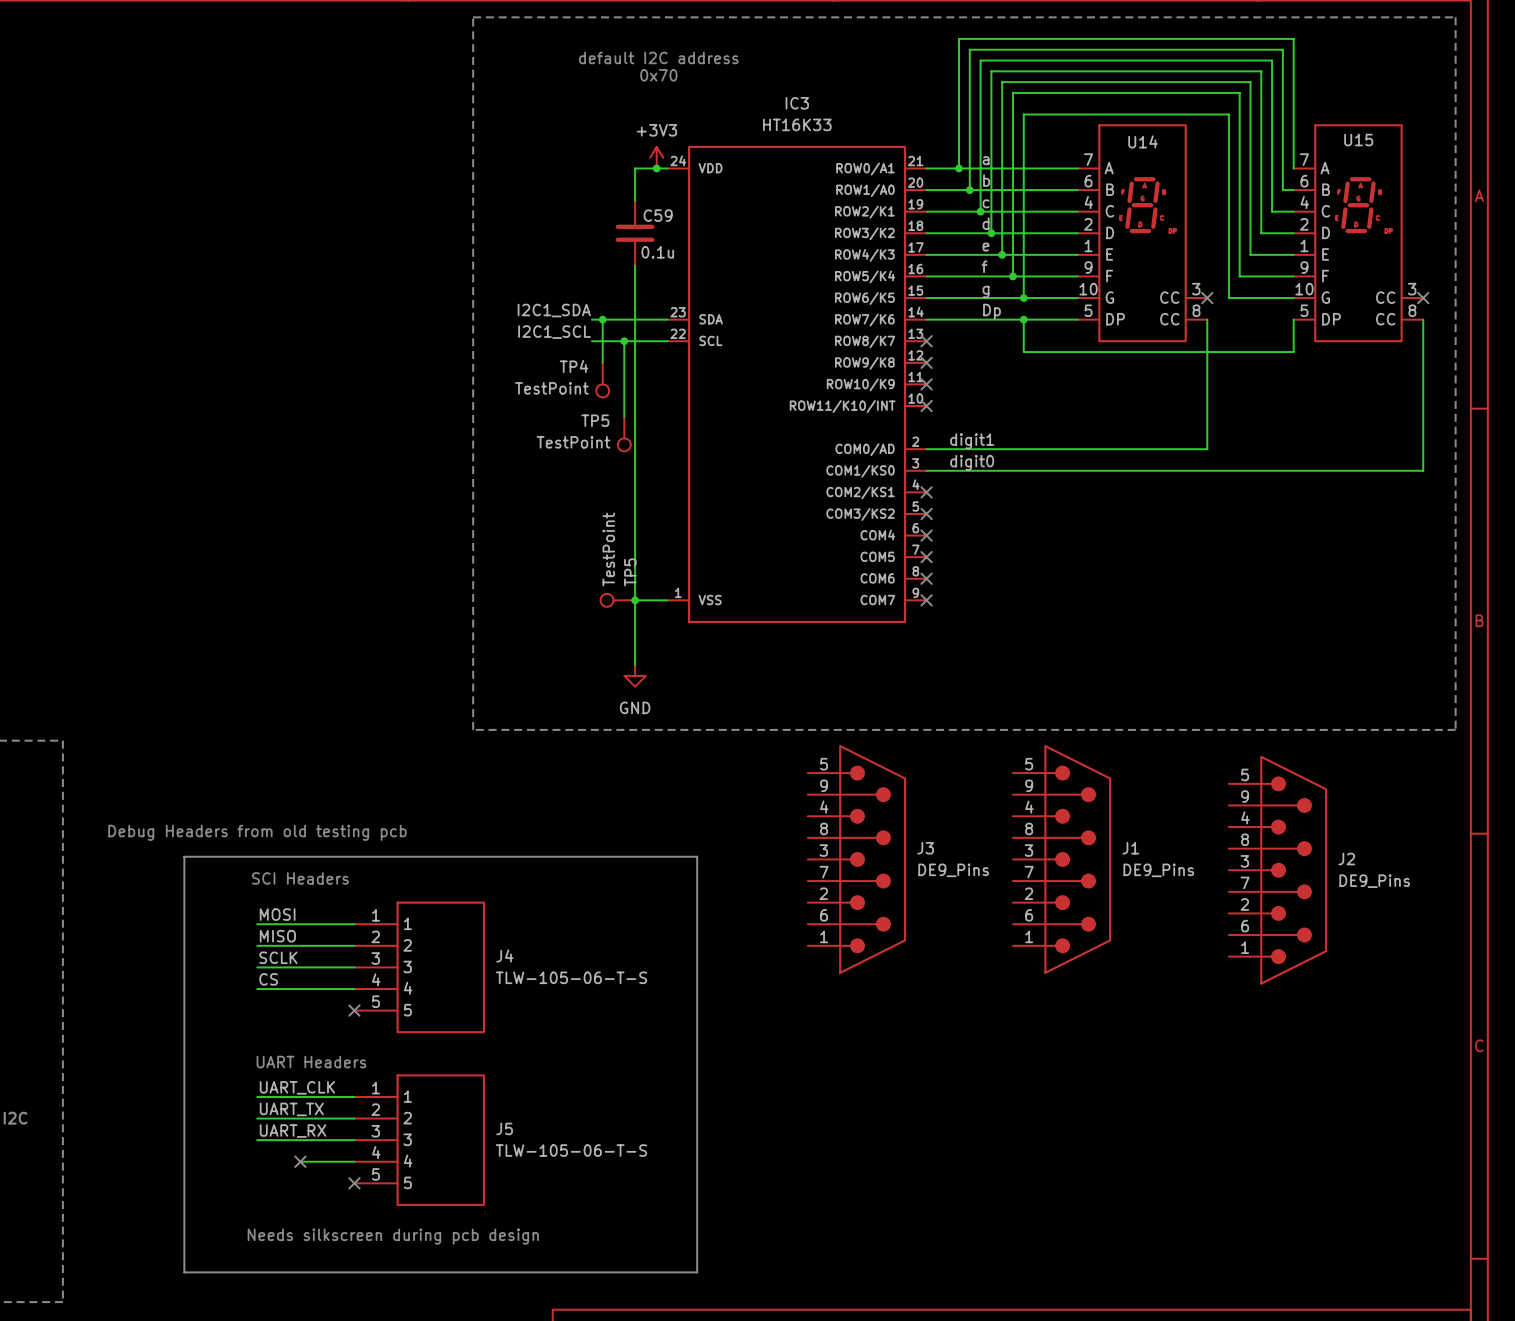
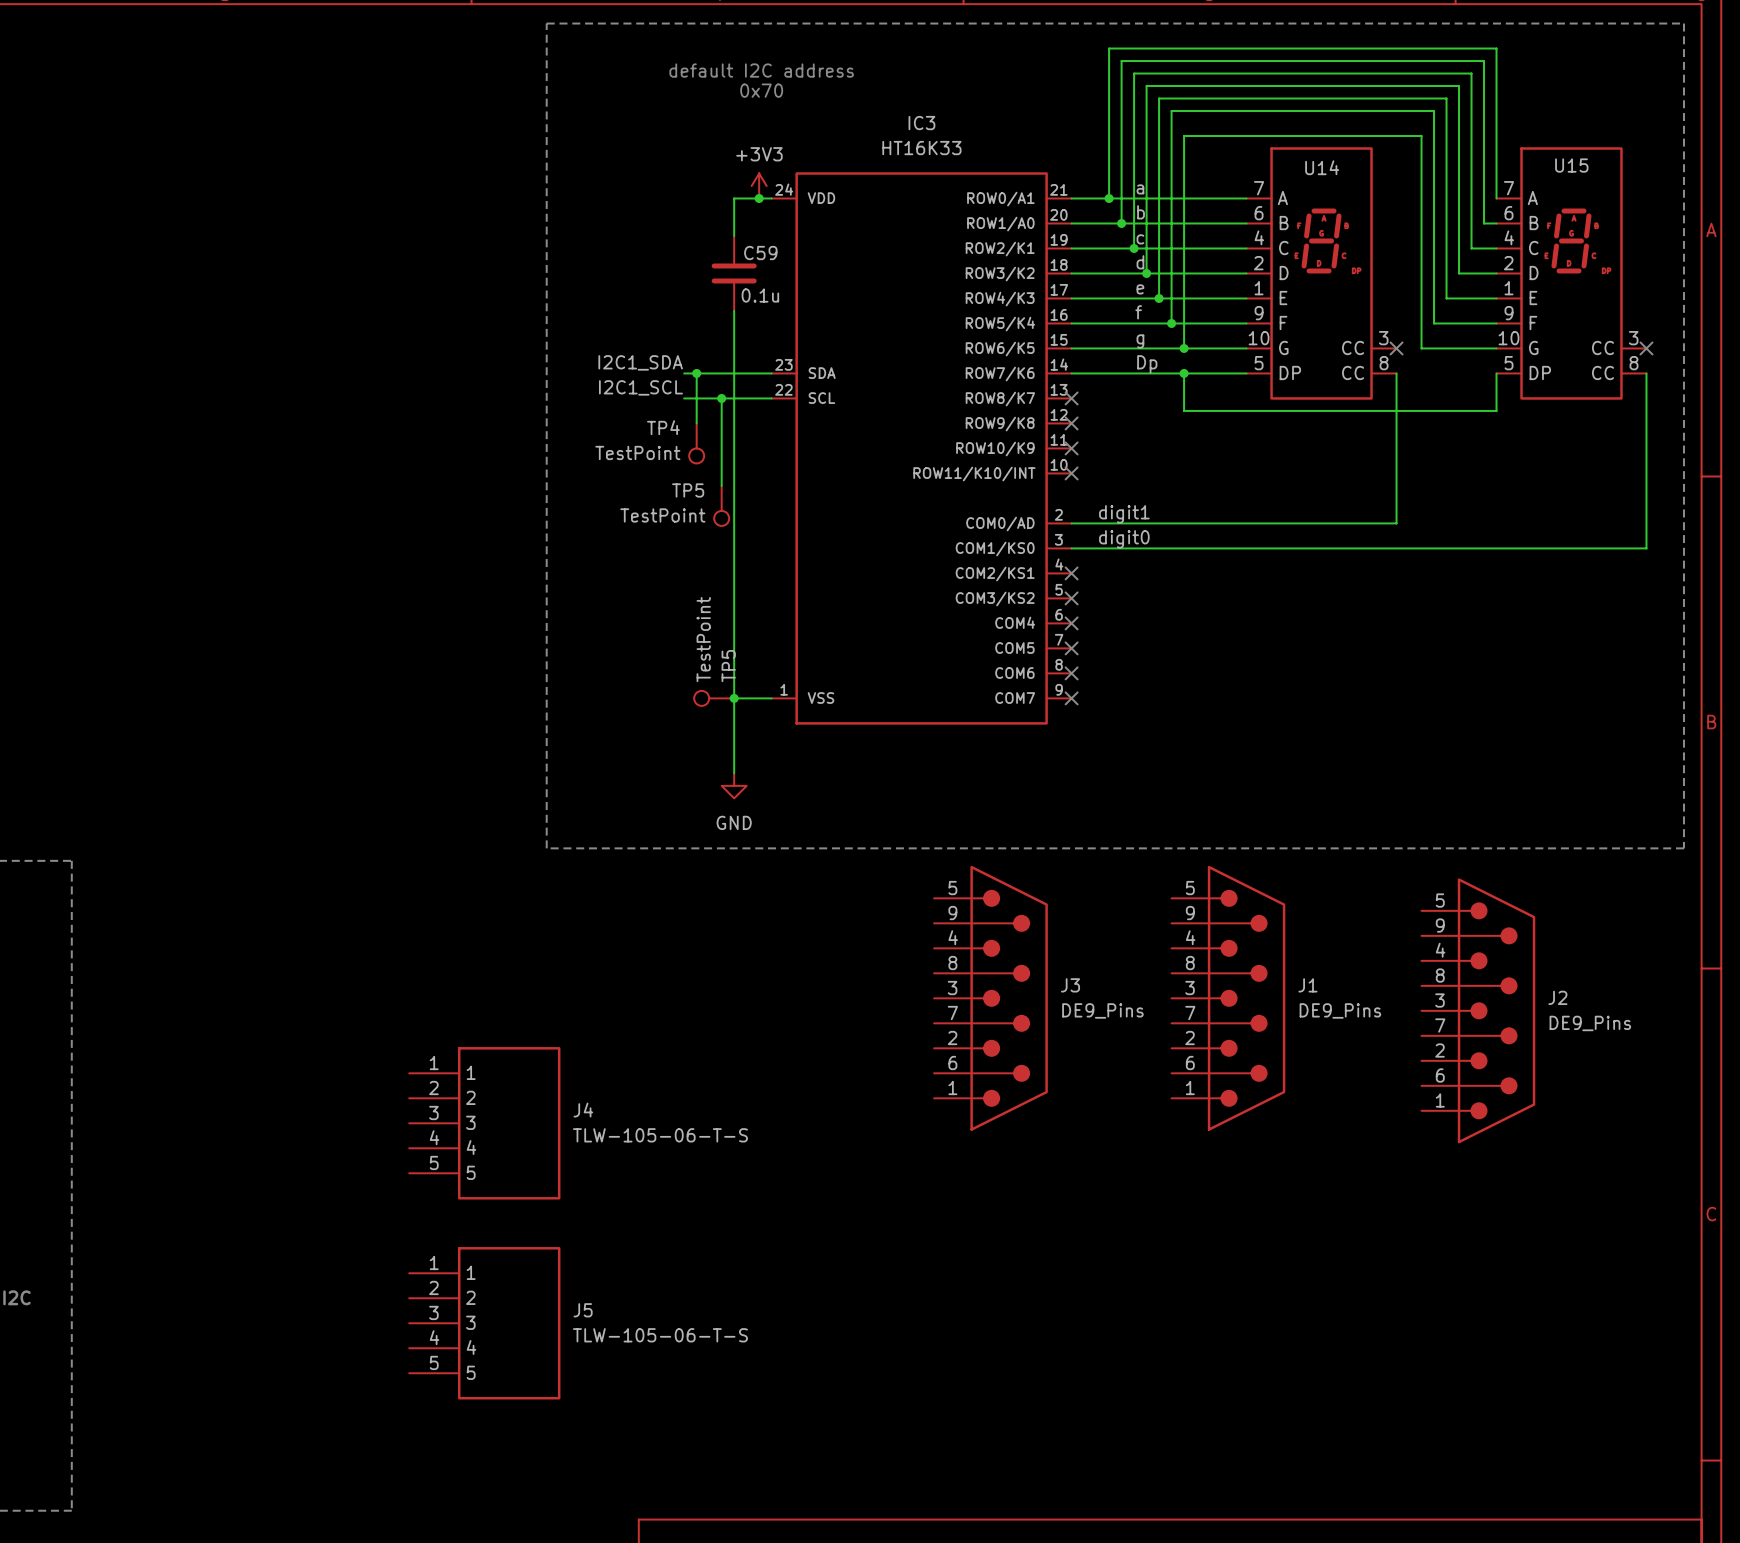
text: Debug Headers from old testing pcb (257, 832) -> none
line: (184, 856) (697, 856) (697, 1272) (184, 1272) (184, 856) -> none
text: SCI Headers (300, 878) -> none
label: MOSI (277, 914) -> none
wire: (257, 924) (354, 924) -> none
label: MISO (277, 936) -> none
wire: (257, 945) (354, 945) -> none
label: SCLK (278, 957) -> none
wire: (257, 967) (354, 967) -> none
label: CS (268, 979) -> none
wire: (257, 989) (354, 989) -> none
no-connect mark: (354, 1010) -> none
text: UART Headers (311, 1062) -> none
label: UART_CLK (297, 1087) -> none
wire: (257, 1096) (354, 1096) -> none
label: UART_TX (291, 1109) -> none
wire: (257, 1118) (354, 1118) -> none
label: UART_RX (293, 1131) -> none
wire: (257, 1140) (354, 1140) -> none
wire: (300, 1161) (354, 1161) -> none
no-connect mark: (300, 1161) -> none
no-connect mark: (354, 1183) -> none
text: Needs silkscreen during pcb design (393, 1236) -> none

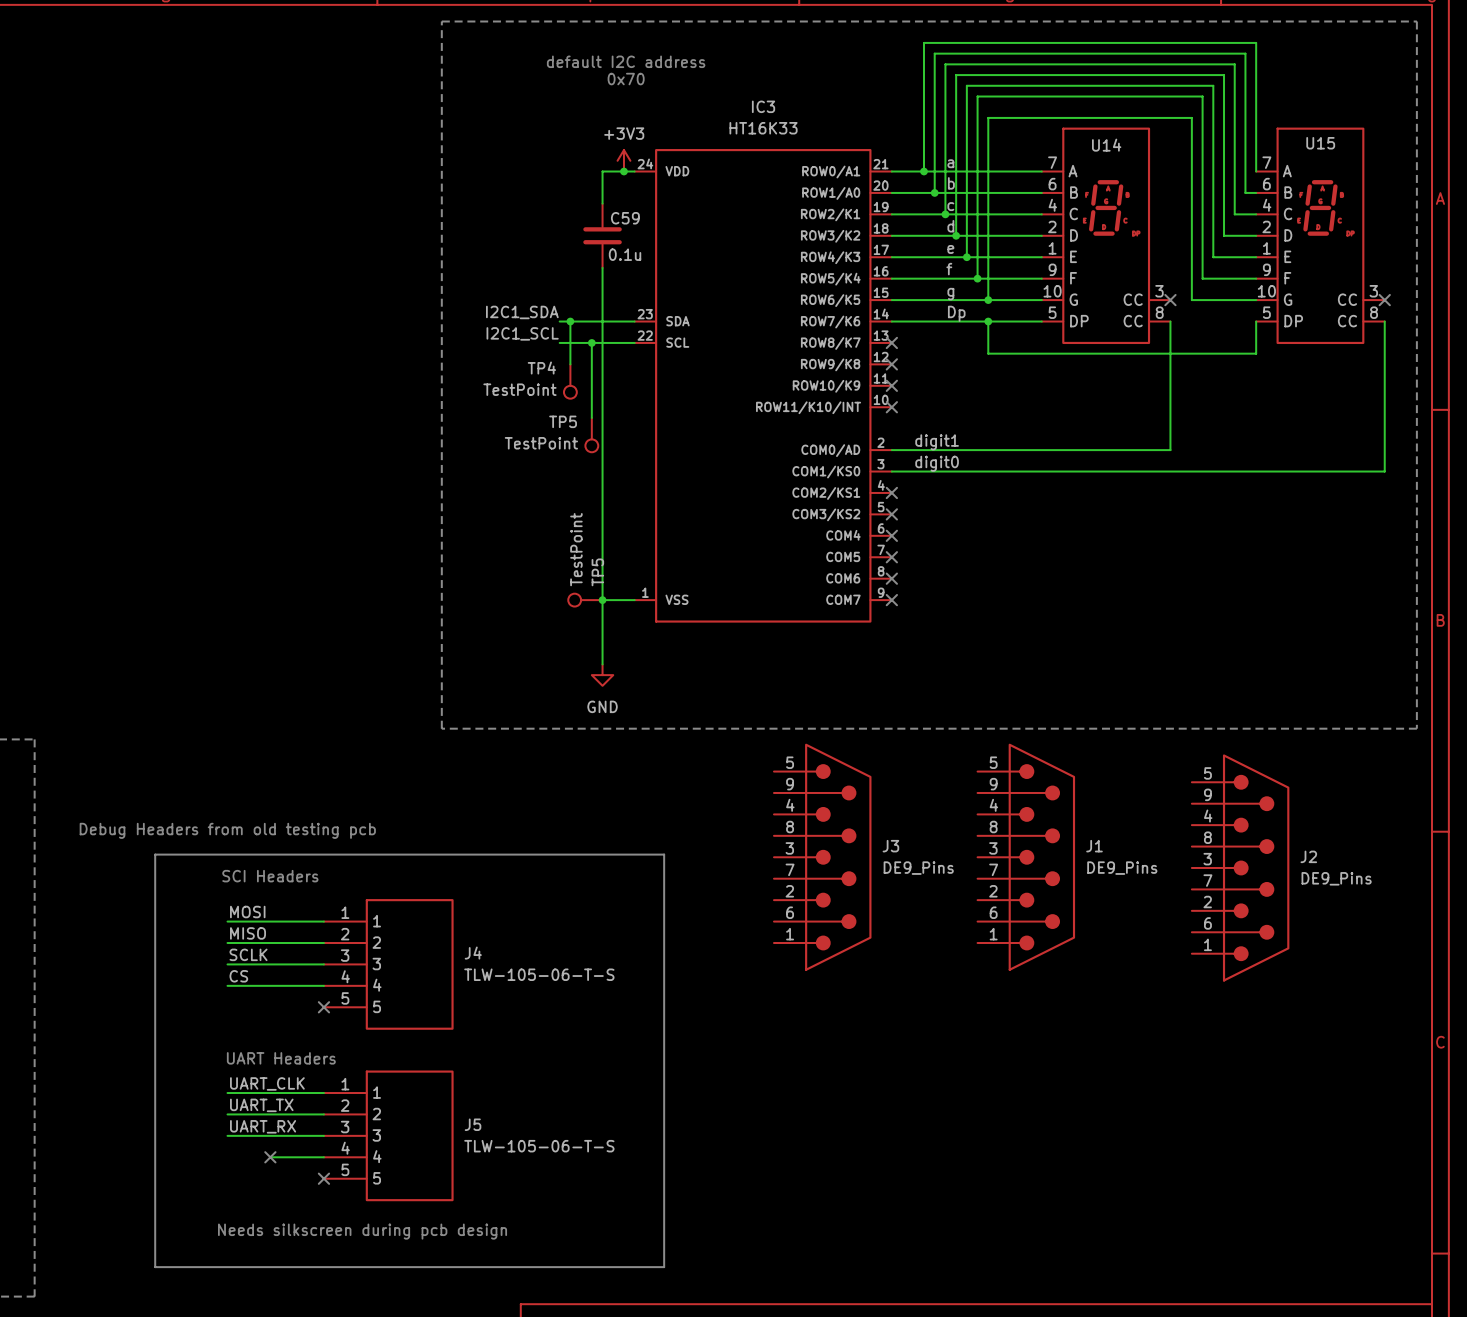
text: none -> Debug Headers from old testing pcb (227, 830)
line: none -> (155, 854) (664, 854) (664, 1267) (155, 1267) (155, 854)
text: none -> SCI Headers (270, 876)
label: none -> MOSI (247, 912)
wire: none -> (227, 921) (323, 921)
label: none -> MISO (248, 933)
wire: none -> (227, 942) (323, 942)
label: none -> SCLK (248, 954)
wire: none -> (227, 964) (323, 964)
label: none -> CS (238, 976)
wire: none -> (227, 985) (323, 985)
no-connect mark: none -> (323, 1007)
text: none -> UART Headers (281, 1058)
label: none -> UART_CLK (267, 1083)
wire: none -> (227, 1093) (323, 1093)
label: none -> UART_TX (261, 1105)
wire: none -> (227, 1114) (323, 1114)
label: none -> UART_RX (263, 1126)
wire: none -> (227, 1135) (323, 1135)
wire: none -> (270, 1157) (323, 1157)
no-connect mark: none -> (270, 1157)
no-connect mark: none -> (323, 1178)
text: none -> Needs silkscreen during pcb design (362, 1231)

